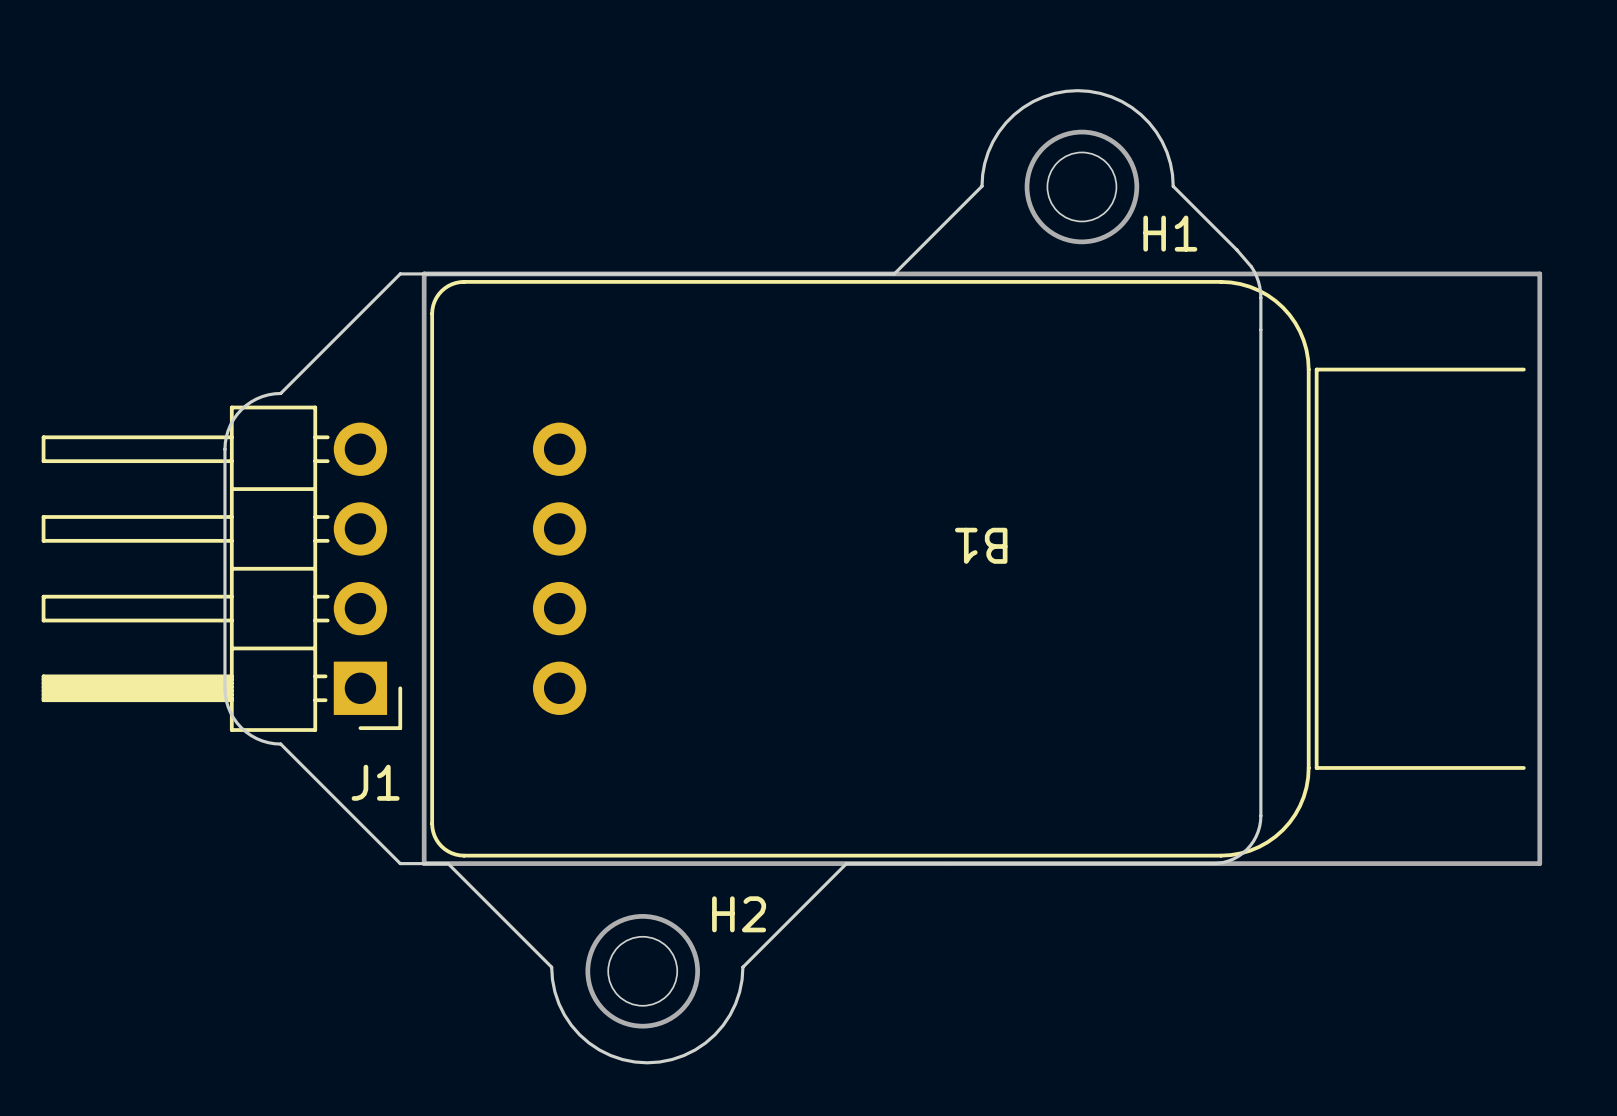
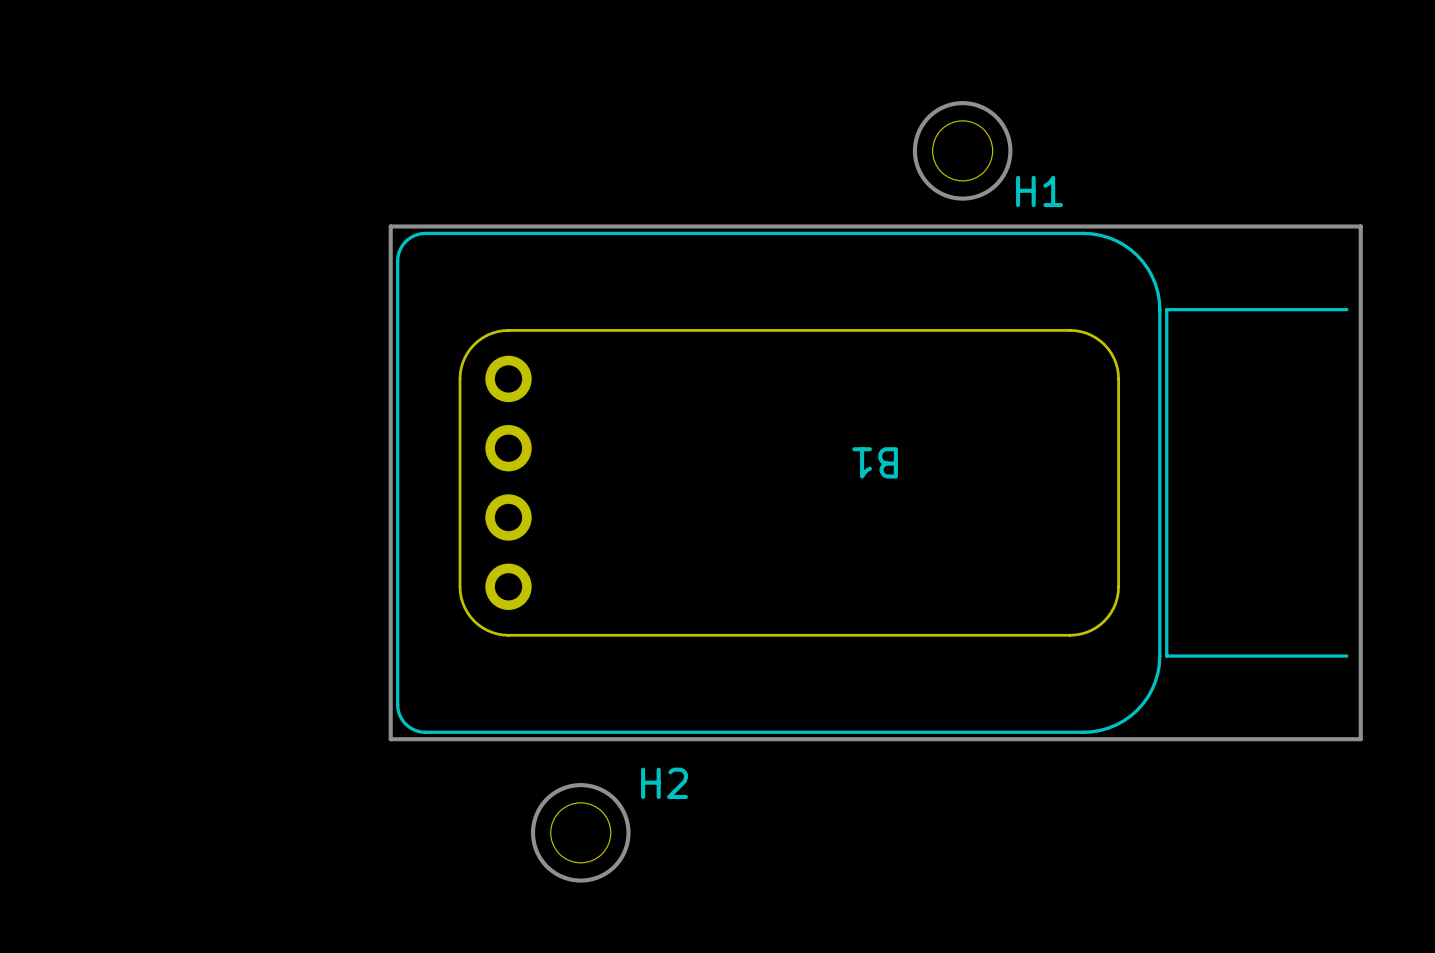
board edge: (981, 186) (894, 273) (400, 273) (280, 393) (262, 396) (251, 402) (241, 409) (230, 425) (224, 449) (224, 688) (228, 706) (233, 717) (245, 731) (256, 738) (280, 744) (400, 863) (448, 863) (551, 967) (554, 991) (564, 1015) (579, 1034) (599, 1050) (610, 1055) (634, 1061) (659, 1061) (683, 1055) (705, 1043) (714, 1034) (730, 1015) (739, 991) (742, 967) (846, 863) (1218, 863) (1228, 860) (1242, 853) (1256, 836) (1260, 815) (1260, 297) (1256, 276) (1251, 266) (1236, 250) (1173, 186) (1167, 152) (1149, 122) (1131, 107) (1111, 96) (1089, 91) (1066, 91) (1043, 96) (1023, 107) (1006, 122) (992, 141) (984, 163) (981, 186) -> none
board edge: none -> (508, 330) (1070, 330) (1091, 335) (1108, 348) (1113, 357) (1118, 373) (1118, 586) (1113, 607) (1108, 617) (1095, 627) (1086, 632) (1070, 635) (508, 635) (487, 630) (470, 617) (462, 602) (460, 592) (460, 373) (464, 357) (474, 344) (487, 335) (508, 330)
J1: (221, 568) -> none

